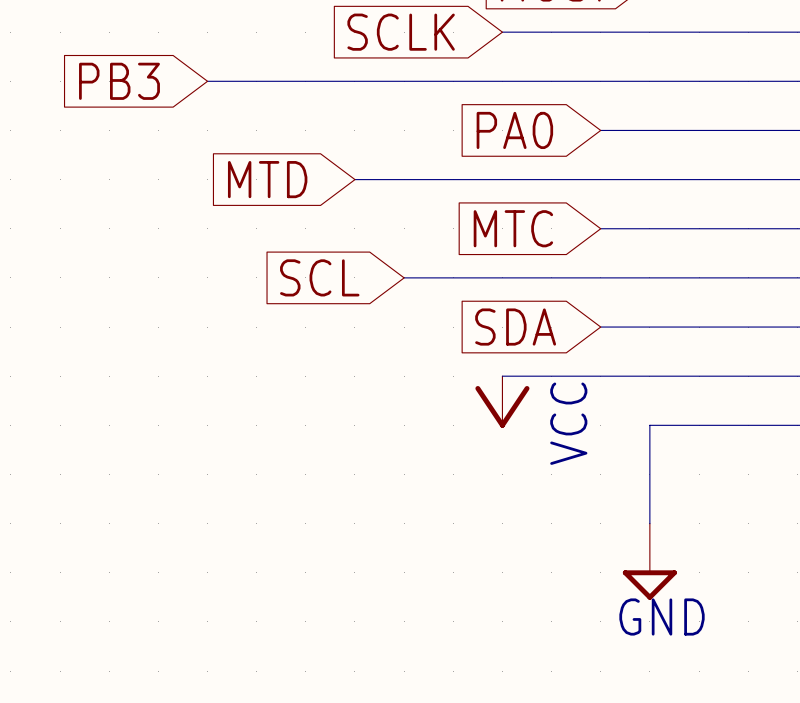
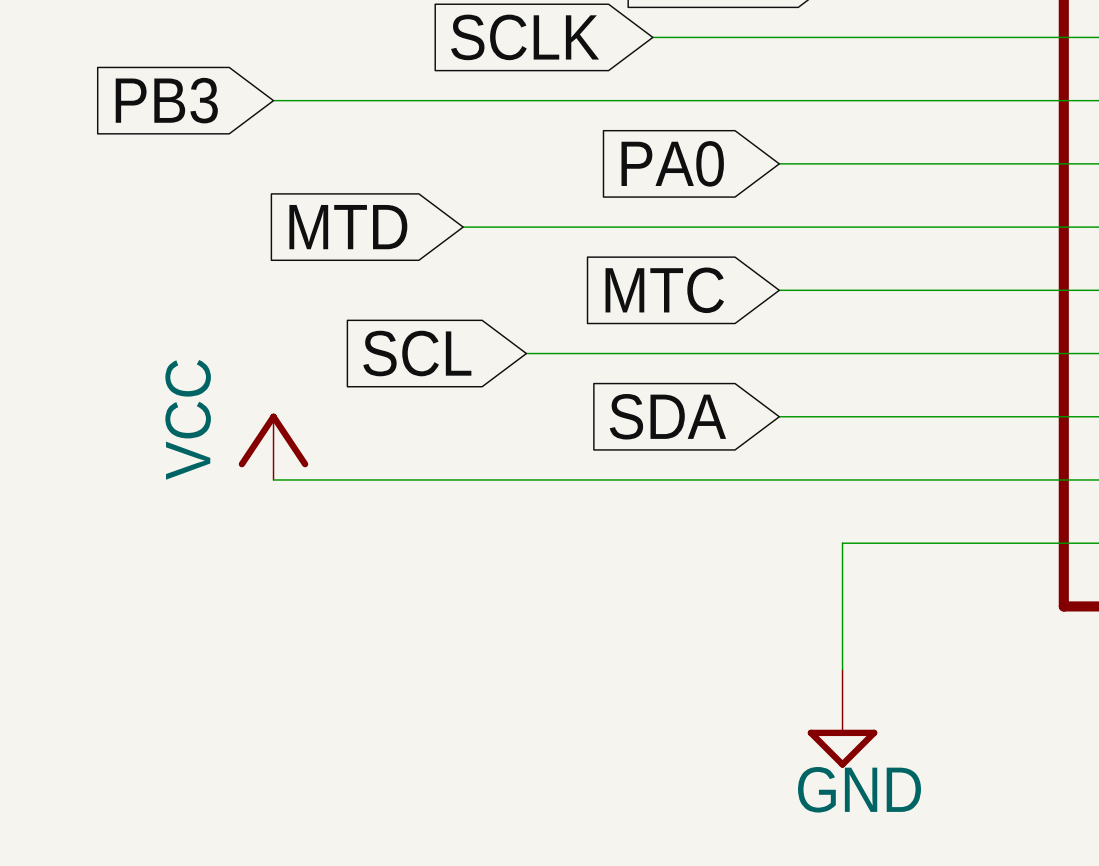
wire: none -> (273, 479) (652, 479)
power symbol position: VCC (502, 401) -> VCC (273, 446)
power symbol rotation: 0° (502, 406) -> 180° (273, 440)

